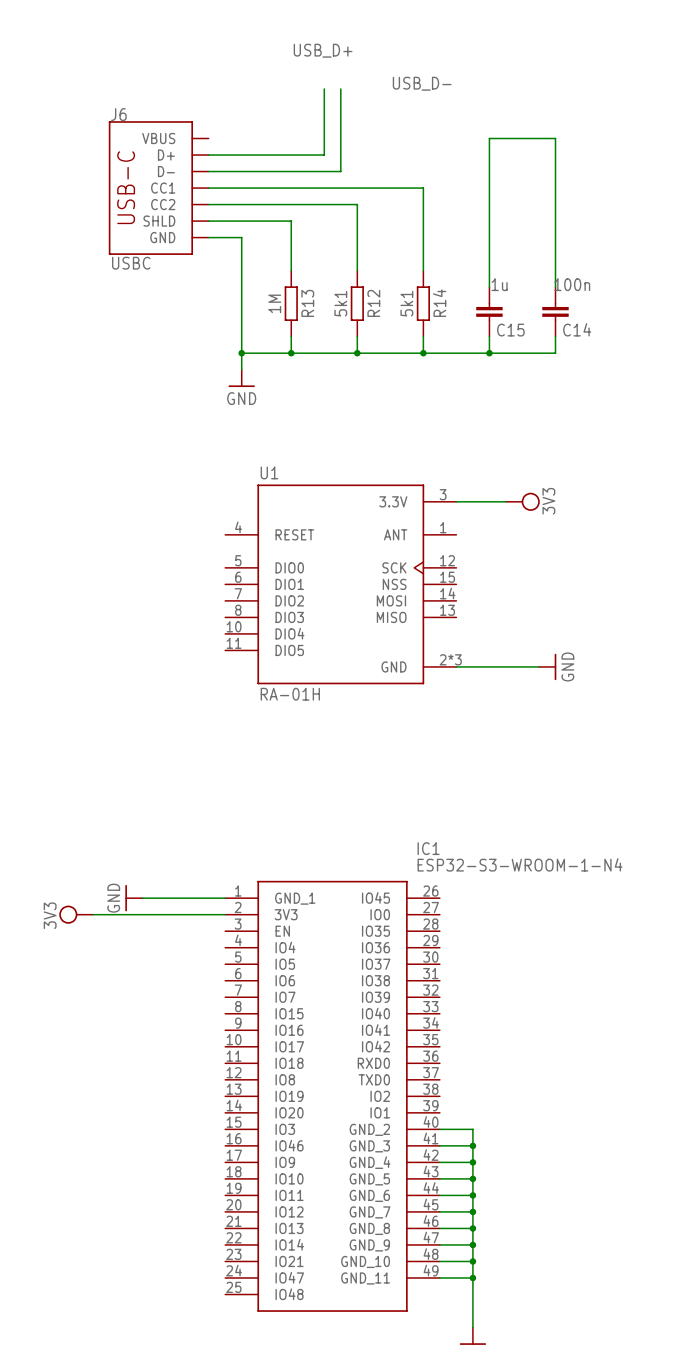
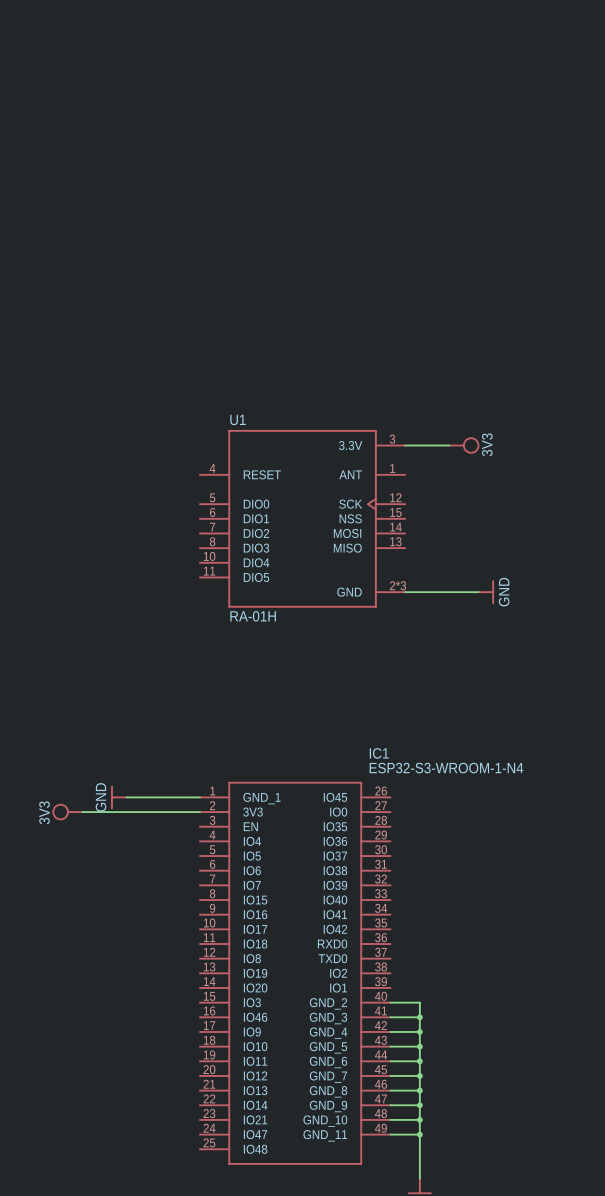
label: USB_D+ (323, 50) -> none
label: USB_D- (422, 83) -> none
wire: (324, 88) (324, 155) (208, 155) -> none
wire: (340, 88) (340, 171) (208, 171) -> none
J6: USBC (158, 188) -> none
wire: (208, 188) (423, 188) (423, 270) -> none
wire: (208, 204) (357, 204) (357, 270) -> none
wire: (208, 221) (291, 221) (291, 270) -> none
wire: (208, 237) (241, 237) (241, 369) -> none
wire: (489, 287) (489, 138) (555, 138) (555, 287) -> none
R13: 1M (291, 303) -> none
R12: 5k1 (357, 303) -> none
R14: 5k1 (423, 303) -> none
C15: 1u (489, 311) -> none
C14: 100n (555, 311) -> none
wire: (291, 336) (291, 353) -> none
wire: (357, 336) (357, 353) -> none
wire: (423, 336) (423, 353) -> none
wire: (489, 336) (489, 353) -> none
wire: (555, 336) (555, 353) (241, 353) -> none
junction: (241, 353) -> none
junction: (291, 353) -> none
junction: (357, 353) -> none
junction: (423, 353) -> none
junction: (489, 353) -> none
power symbol: GND (241, 378) -> none

